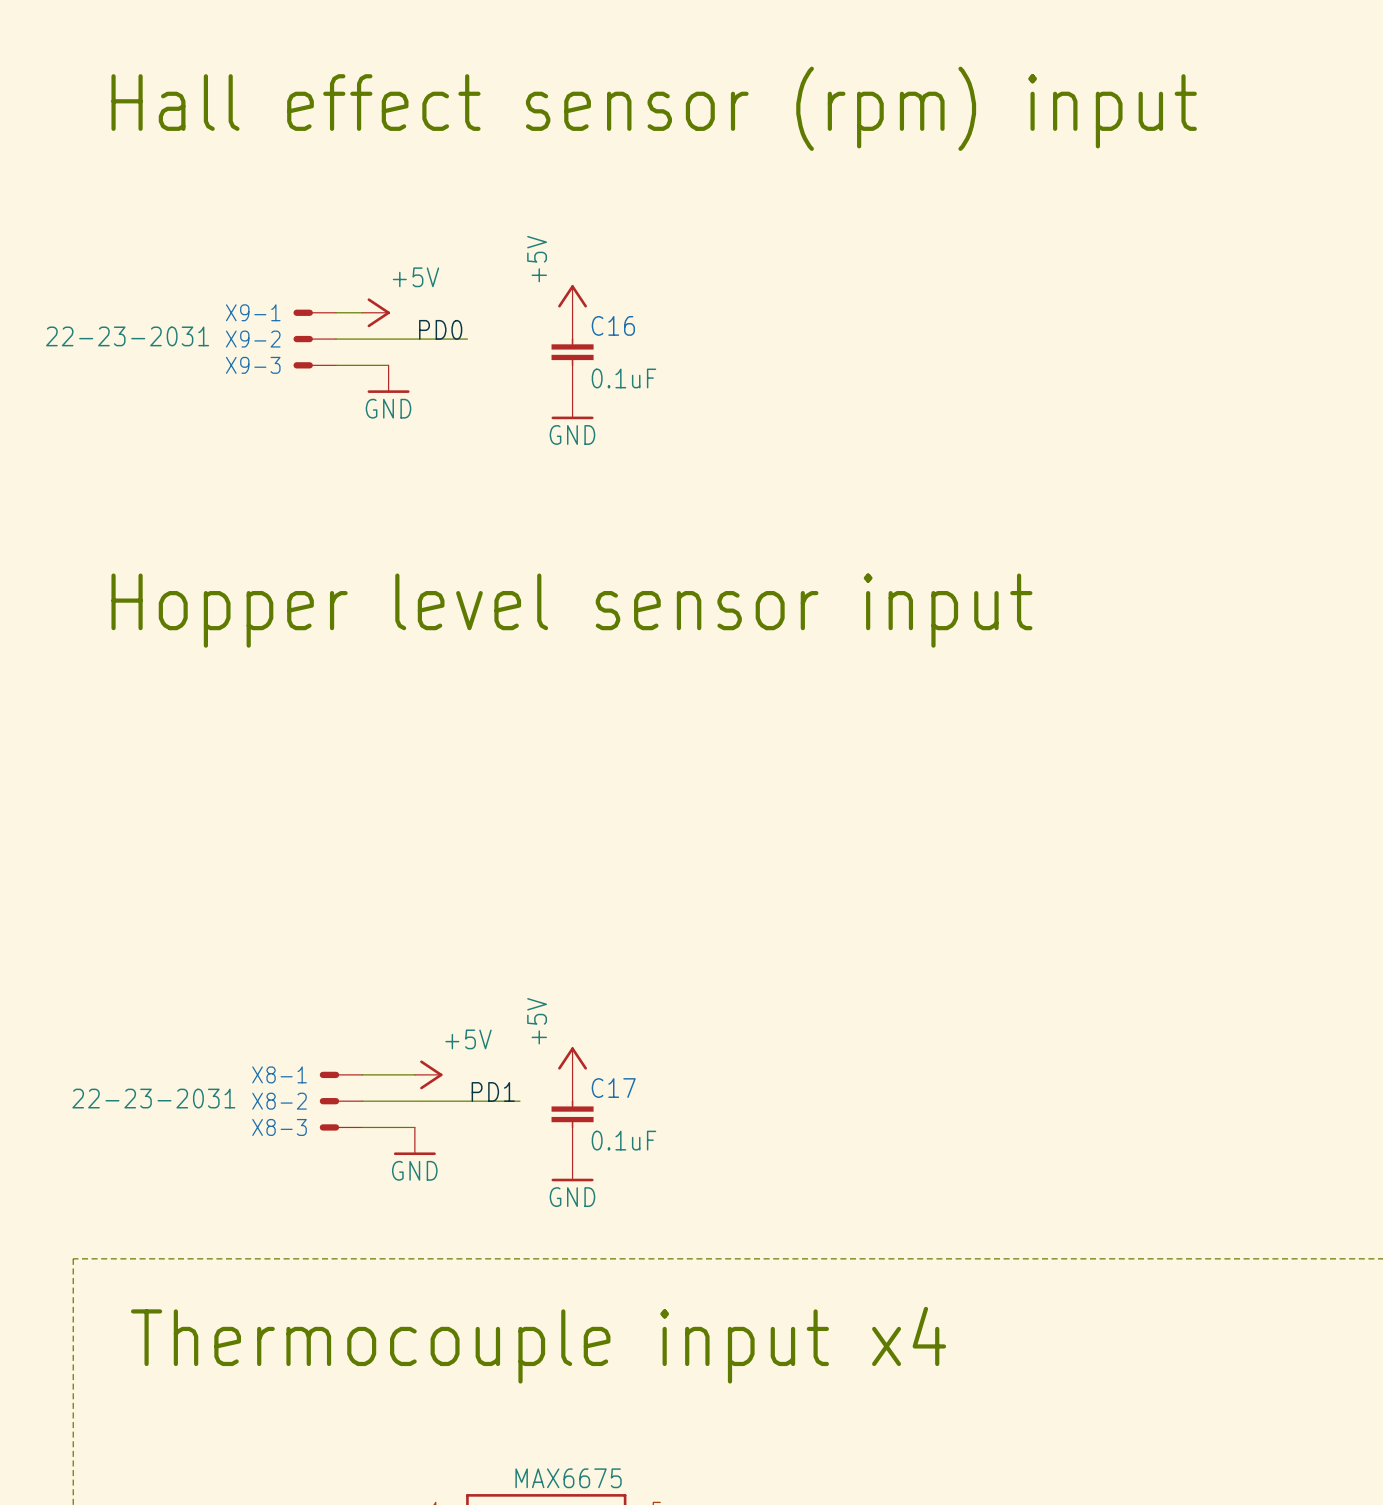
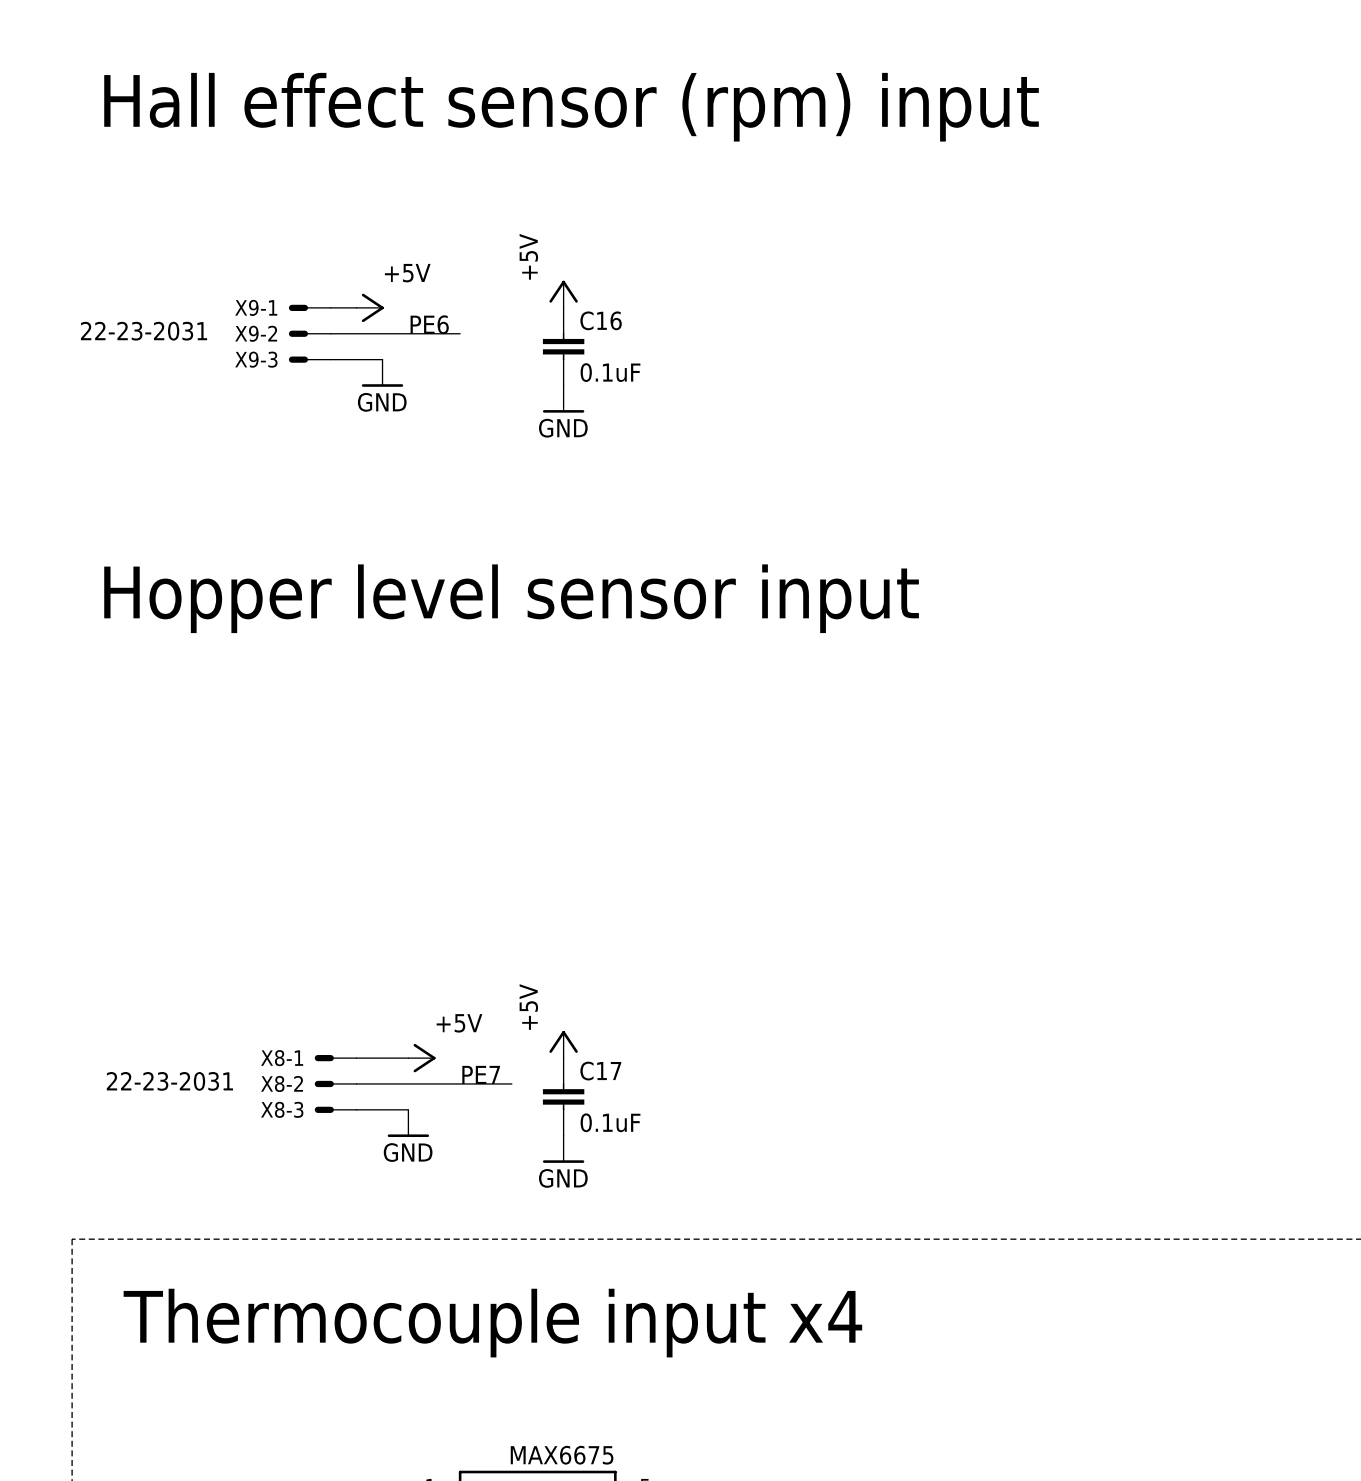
label: PD0 (440, 329) -> PE6 (429, 324)
label: PD1 (493, 1091) -> PE7 (481, 1074)

